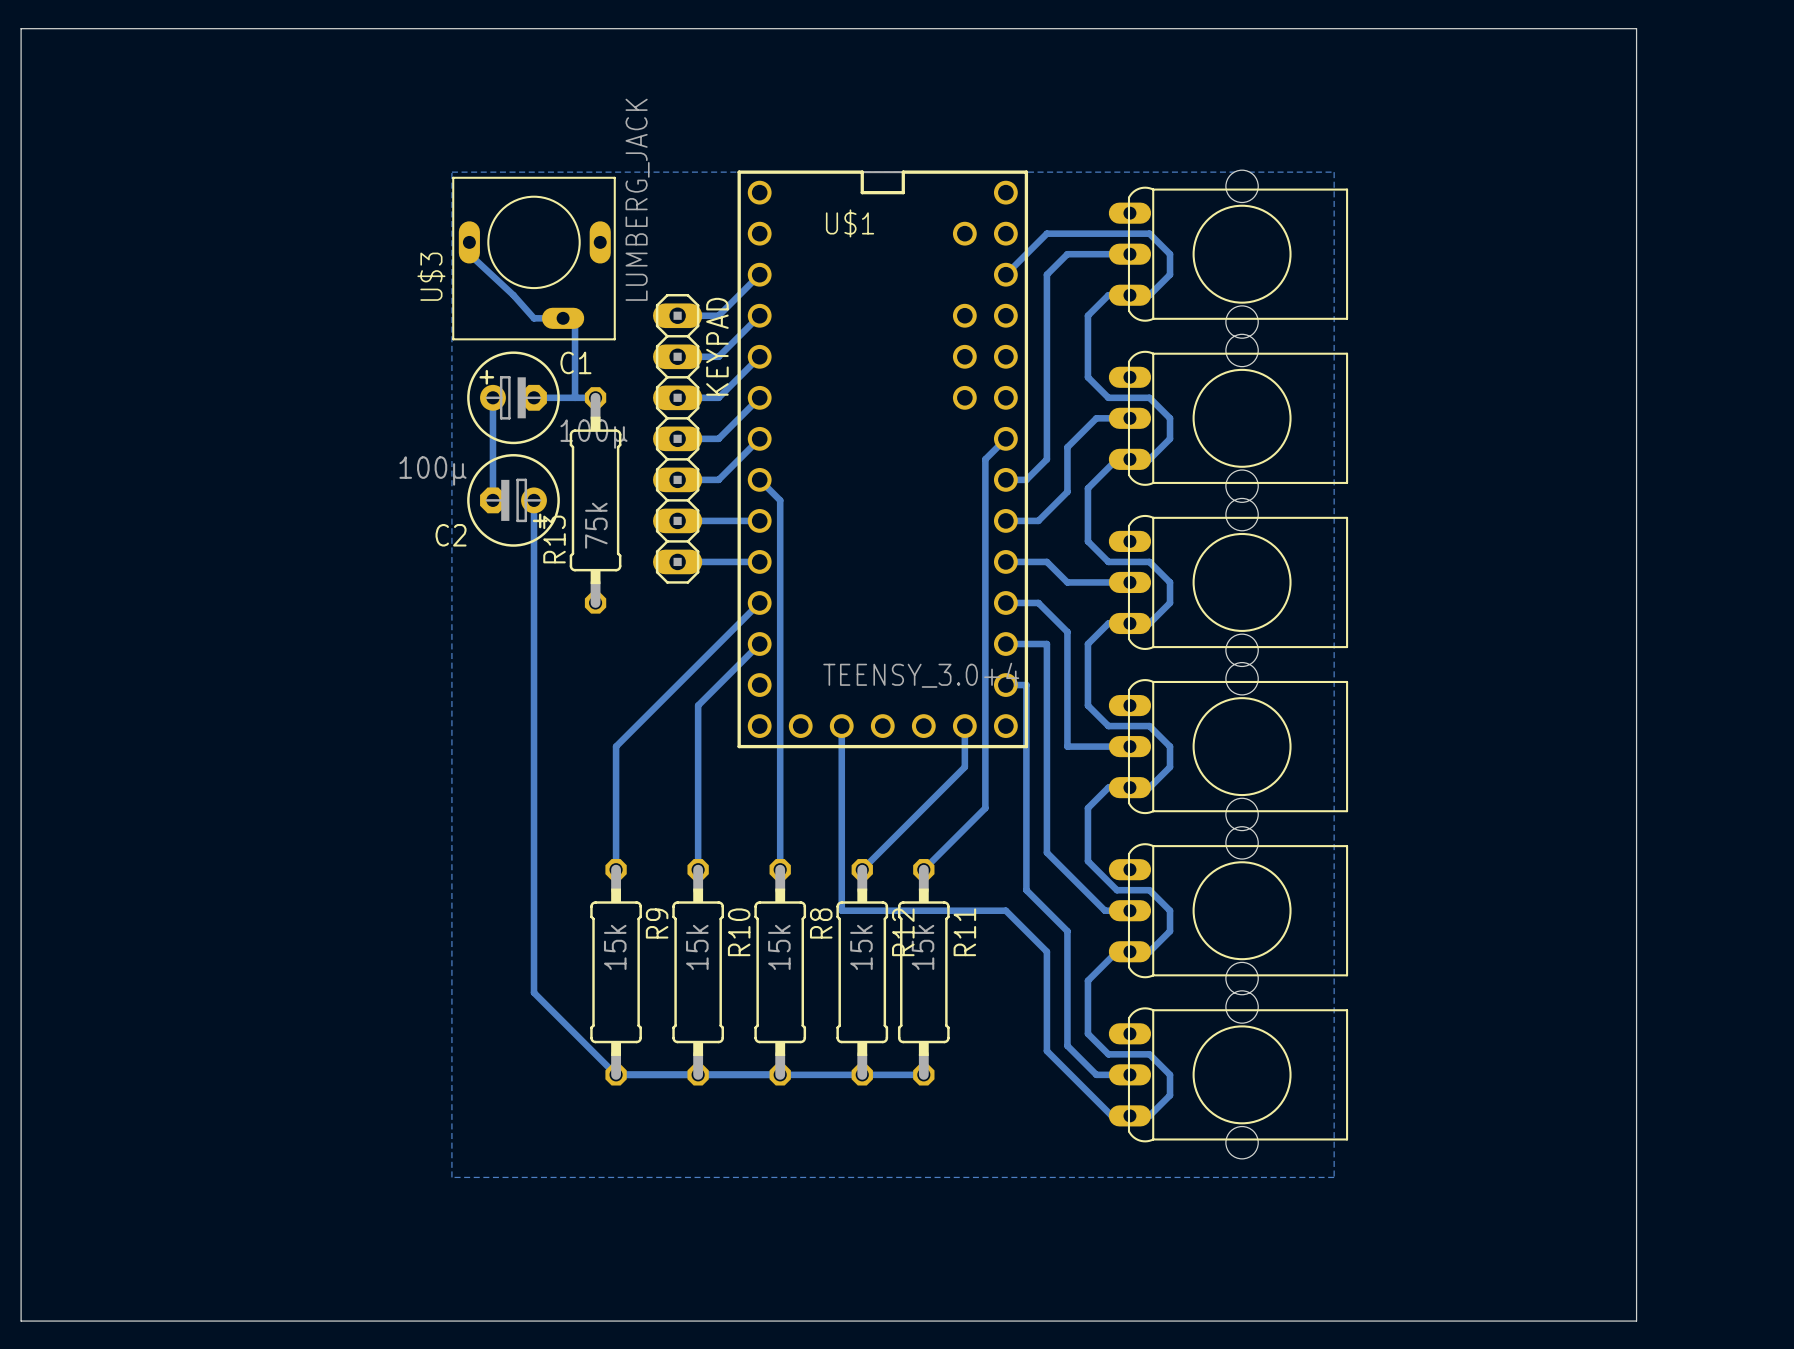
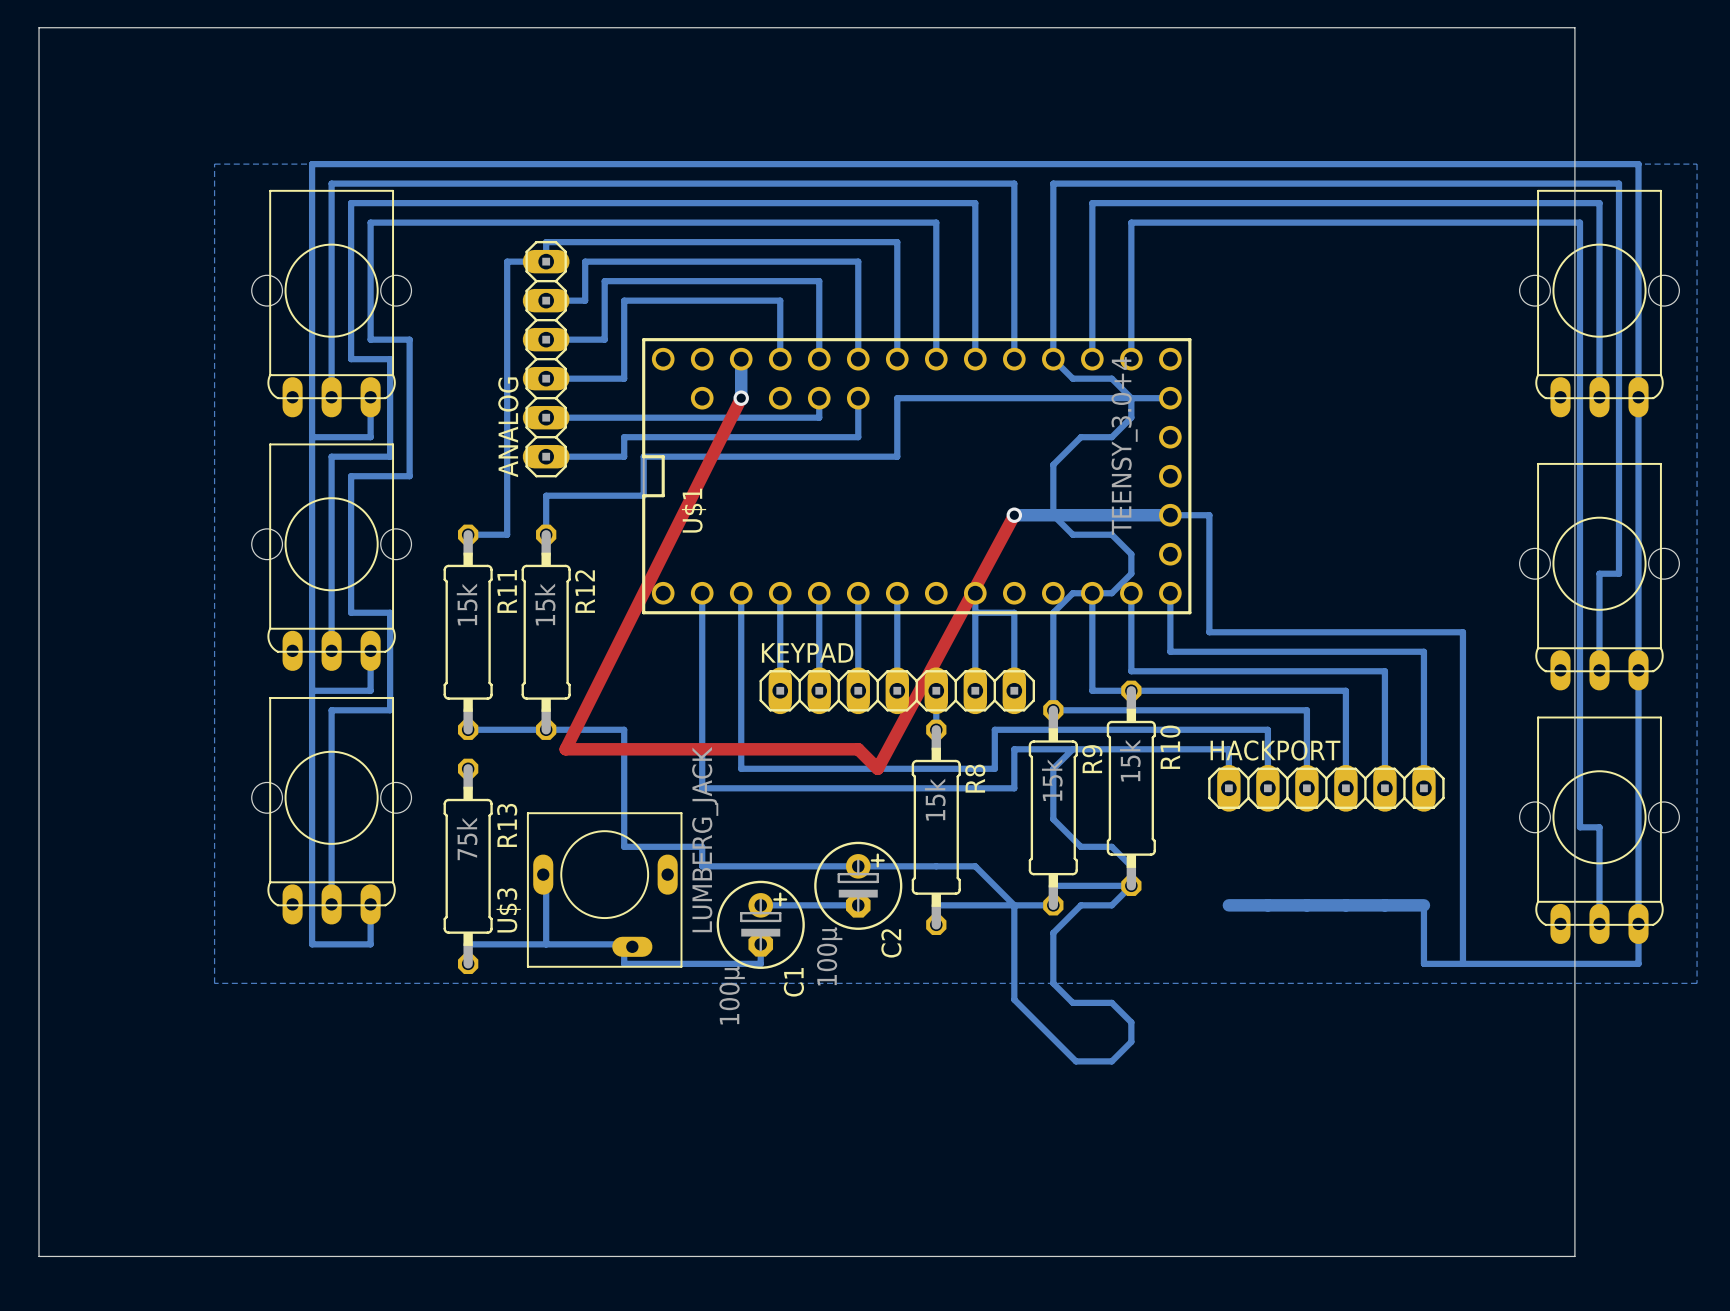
bottom zone outline: (451, 172) (451, 1177) (1334, 1177) (1334, 172) -> (448, 164) (214, 164) (214, 983) (1697, 983) (1697, 164) (1287, 164)
bottom track: (469, 242) (469, 254) (513, 295) (534, 318) (575, 318) (575, 397) -> none
bottom track: (1129, 254) (1067, 254) (1046, 274) -> (331, 397) (331, 183) (1014, 183) (1014, 261)
bottom track: (1170, 254) (1149, 233) (1046, 233) (1005, 274) -> (1131, 242) (1131, 222) (1579, 222) (1579, 827) (1599, 827) (1599, 923)
part: (1228, 254) -> none
U$3 position: (534, 258) -> (604, 889)
bottom track: (759, 274) (718, 315) -> (780, 359) (780, 300) (702, 300)
bottom track: (1170, 274) (1149, 295) (1108, 295) (1087, 315) -> (1131, 261) (1131, 359)
bottom track: none -> (546, 300) (585, 300) (585, 261) (858, 261) (858, 359)
bottom track: none -> (663, 300) (624, 300) (624, 378) (585, 378)
bottom track: (759, 315) (718, 356) (677, 356) -> none
bottom track: none -> (1053, 300) (1053, 183) (1619, 183) (1619, 573) (1599, 573) (1599, 670)
part: none -> (331, 303)
part: none -> (1599, 303)
KEYPAD name position: KEYPAD (717, 346) -> KEYPAD (807, 652)
bottom track: none -> (546, 339) (604, 339) (604, 281) (819, 281) (819, 359)
bottom track: (759, 356) (718, 397) (677, 397) -> none
ANALOG: none -> (546, 359)
bottom track: none -> (741, 359) (741, 398)
bottom track: none -> (897, 359) (897, 242) (546, 242) (546, 261) (507, 261) (507, 534) (468, 534)
bottom track: none -> (936, 359) (936, 222) (370, 222) (370, 339) (409, 339) (409, 476) (351, 476) (351, 612) (390, 612) (390, 710) (331, 710) (331, 904)
bottom track: none -> (975, 359) (975, 203) (351, 203) (351, 359) (390, 359) (390, 456) (331, 456) (331, 651)
bottom track: (1046, 377) (1046, 459) (1026, 479) (1005, 479) -> none
bottom track: none -> (1092, 359) (1092, 203) (1599, 203) (1599, 397)
bottom track: (492, 397) (492, 500) -> (780, 593) (780, 690)
C1 rotation: 0° (513, 397) -> 90° clockwise (760, 924)
C1 position: (513, 397) -> (760, 924)
bottom track: (759, 397) (718, 438) -> (819, 398) (819, 417) (702, 417)
bottom track: none -> (370, 397) (370, 437) (312, 437)
top track: none -> (741, 398) (565, 749) (858, 749) (877, 768) (1014, 515)
via: none -> (741, 398)
bottom track: none -> (858, 398) (858, 437) (624, 437) (624, 456) (546, 456)
bottom track: (1096, 418) (1067, 447) (1067, 491) (1038, 520) (1005, 520) -> (1061, 398) (897, 398) (897, 456) (702, 456)
bottom track: none -> (1093, 398) (1170, 398)
part: (1228, 418) -> none
bottom track: none -> (546, 417) (663, 417)
KEYPAD rotation: 0° (677, 438) -> 90° clockwise (897, 690)
KEYPAD position: (677, 438) -> (897, 690)
bottom track: (759, 438) (718, 479) -> none
bottom track: (1005, 438) (985, 459) (985, 808) (923, 869) -> none
U$1 rotation: 0° (882, 459) -> 90° counterclockwise (916, 476)
bottom track: none -> (663, 456) (643, 456) (643, 495) (546, 495) (546, 534)
bottom track: (759, 479) (780, 500) (780, 869) -> none
C2 rotation: 0° (513, 500) -> 90° counterclockwise (858, 885)
C2 position: (513, 500) -> (858, 885)
bottom track: (534, 500) (534, 992) (616, 1074) (923, 1074) -> none
R13 position: (595, 500) -> (468, 866)
bottom track: (677, 520) (759, 520) -> none
R13 value position: 75k (596, 525) -> 75k (467, 838)
R13 name position: R13 (554, 539) -> R13 (507, 825)
bottom track: none -> (1014, 515) (1209, 515) (1209, 632) (1462, 632) (1462, 963)
via: none -> (1014, 515)
bottom track: (677, 561) (759, 561) -> none
bottom track: (1005, 561) (1046, 561) (1067, 582) (1129, 582) -> none
part: (1228, 582) -> none
part: none -> (331, 557)
bottom track: (759, 602) (616, 746) (616, 869) -> none
bottom track: (1005, 602) (1038, 602) (1067, 631) (1067, 746) (1087, 746) -> none
part: none -> (1599, 576)
bottom track: none -> (858, 593) (858, 690)
bottom track: none -> (897, 593) (897, 690)
bottom track: none -> (975, 593) (975, 690)
bottom track: none -> (1092, 593) (1092, 690)
bottom track: none -> (1131, 593) (1131, 671) (1384, 671) (1384, 788)
bottom track: none -> (1170, 593) (1170, 651) (1423, 651) (1423, 788)
bottom track: (759, 644) (698, 705) (698, 869) -> none
bottom track: none -> (370, 650) (370, 690) (312, 690)
bottom track: (1005, 685) (1026, 685) (1026, 767) -> (1267, 788) (1267, 729) (994, 729)
bottom track: (1087, 705) (1108, 726) (1128, 726) -> (1053, 671) (1053, 710)
bottom track: (841, 726) (841, 910) -> (819, 690) (819, 593)
bottom track: (1046, 726) (1046, 787) -> (1072, 749) (1014, 749)
bottom track: (1149, 726) (1170, 746) (1170, 767) (1149, 787) -> (1228, 788) (1228, 749) (1111, 749)
bottom track: none -> (1111, 690) (1345, 690) (1345, 788)
bottom track: none -> (1093, 710) (1306, 710) (1306, 788)
part: (1228, 746) -> none
bottom track: none -> (468, 729) (624, 729) (624, 846) (702, 846) (702, 866) (819, 866)
bottom track: (964, 767) (862, 869) -> none
bottom track: (1026, 808) (1026, 890) (1067, 931) (1067, 1045) (1096, 1074) (1129, 1074) -> (994, 768) (741, 768) (741, 593)
bottom track: (1046, 828) (1046, 852) (1104, 910) (1129, 910) -> (1014, 788) (702, 788) (702, 593)
HACKPORT: none -> (1326, 788)
part: none -> (331, 810)
part: none -> (1599, 830)
part: (1228, 910) -> none
bottom track: none -> (546, 885) (546, 944)
bottom track: none -> (1131, 885) (1053, 885) (1053, 905) (936, 905)
bottom track: none -> (370, 904) (370, 944) (312, 944) (312, 164) (1638, 164) (1638, 963) (1423, 963) (1423, 905) (1228, 905)
bottom track: none -> (760, 905) (858, 905)
R9 position: (616, 972) -> (1053, 807)
R10 position: (698, 972) -> (1131, 788)
R8 position: (780, 972) -> (936, 827)
R12 position: (862, 972) -> (546, 632)
R11 position: (923, 972) -> (468, 632)
bottom track: none -> (760, 944) (760, 963) (624, 963) (624, 944) (468, 944) (468, 963)
part: (1228, 1074) -> none

